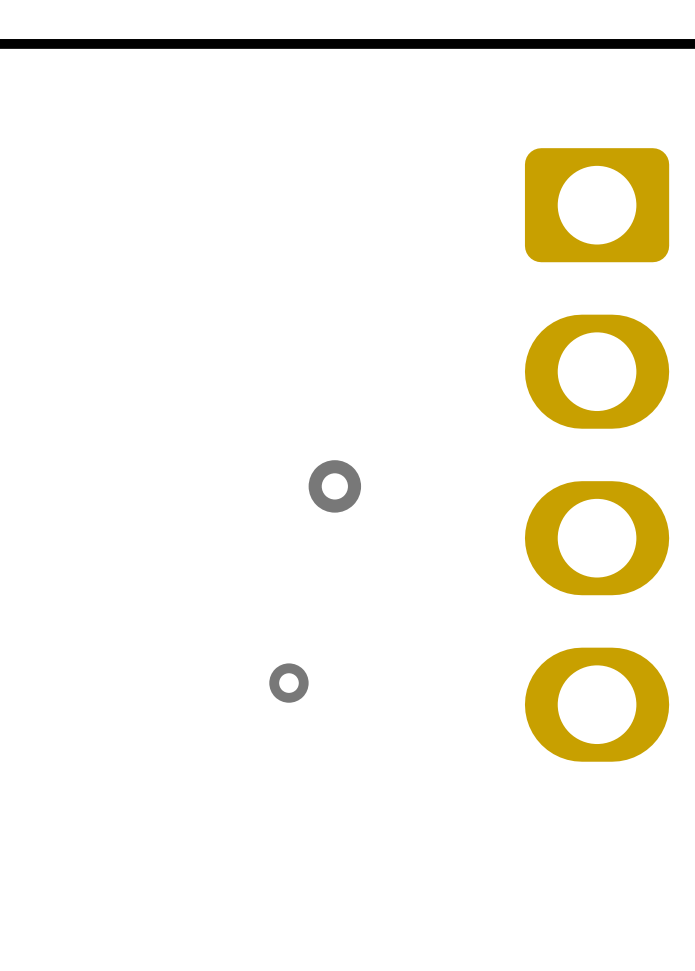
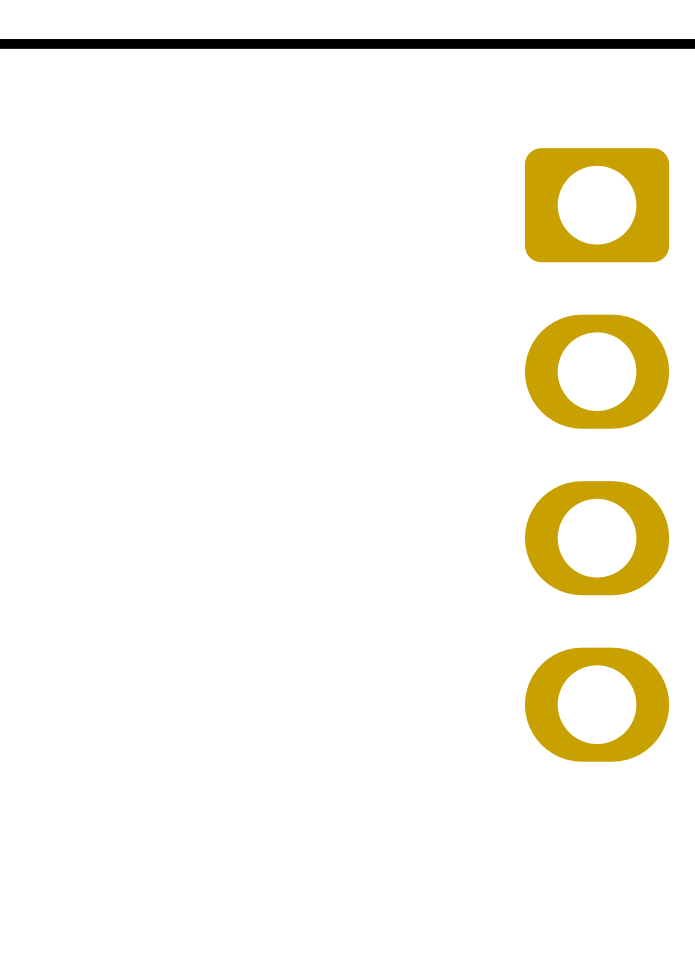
via: (334, 486) -> none
via: (288, 683) -> none

